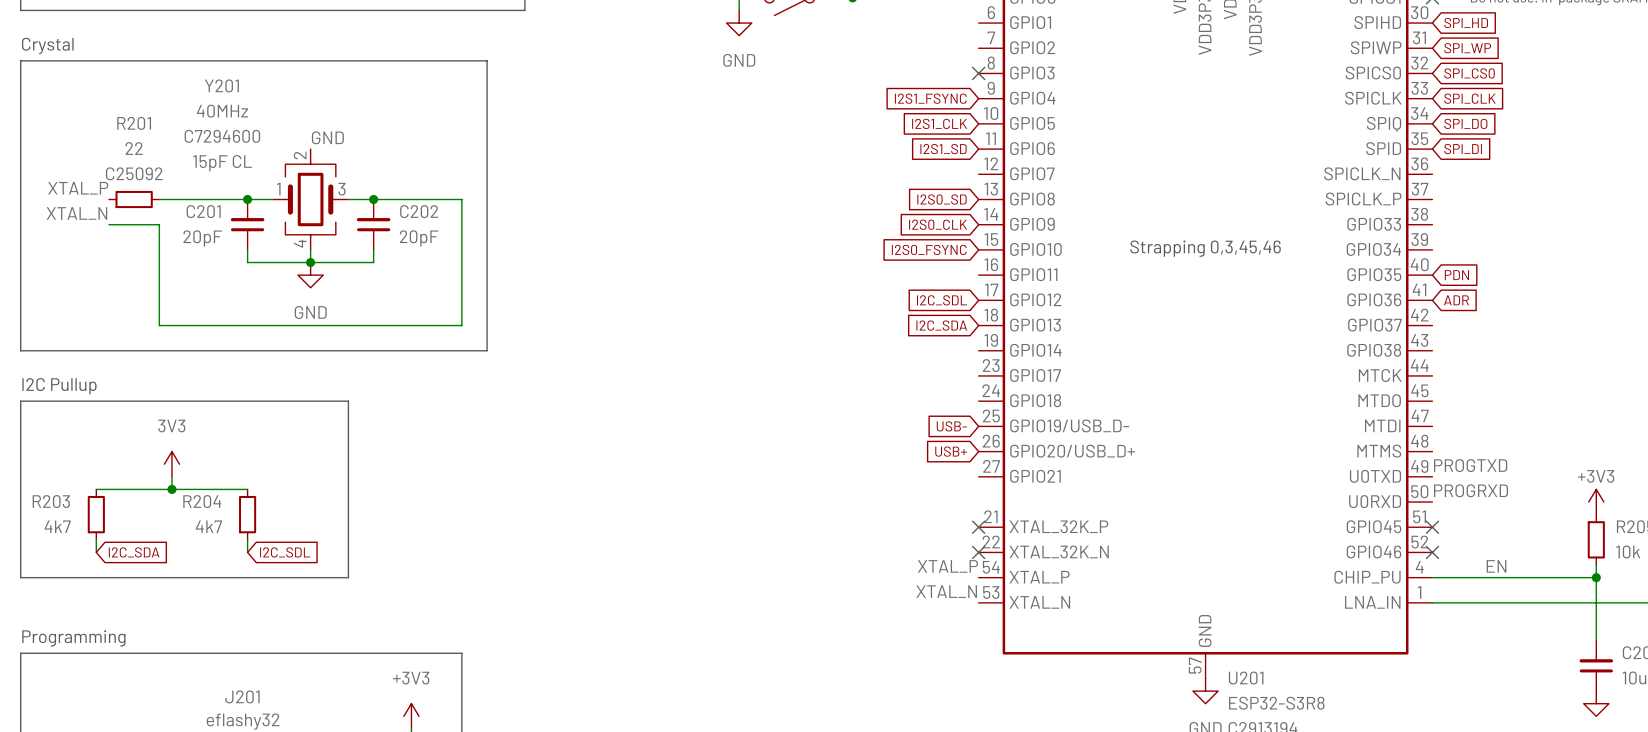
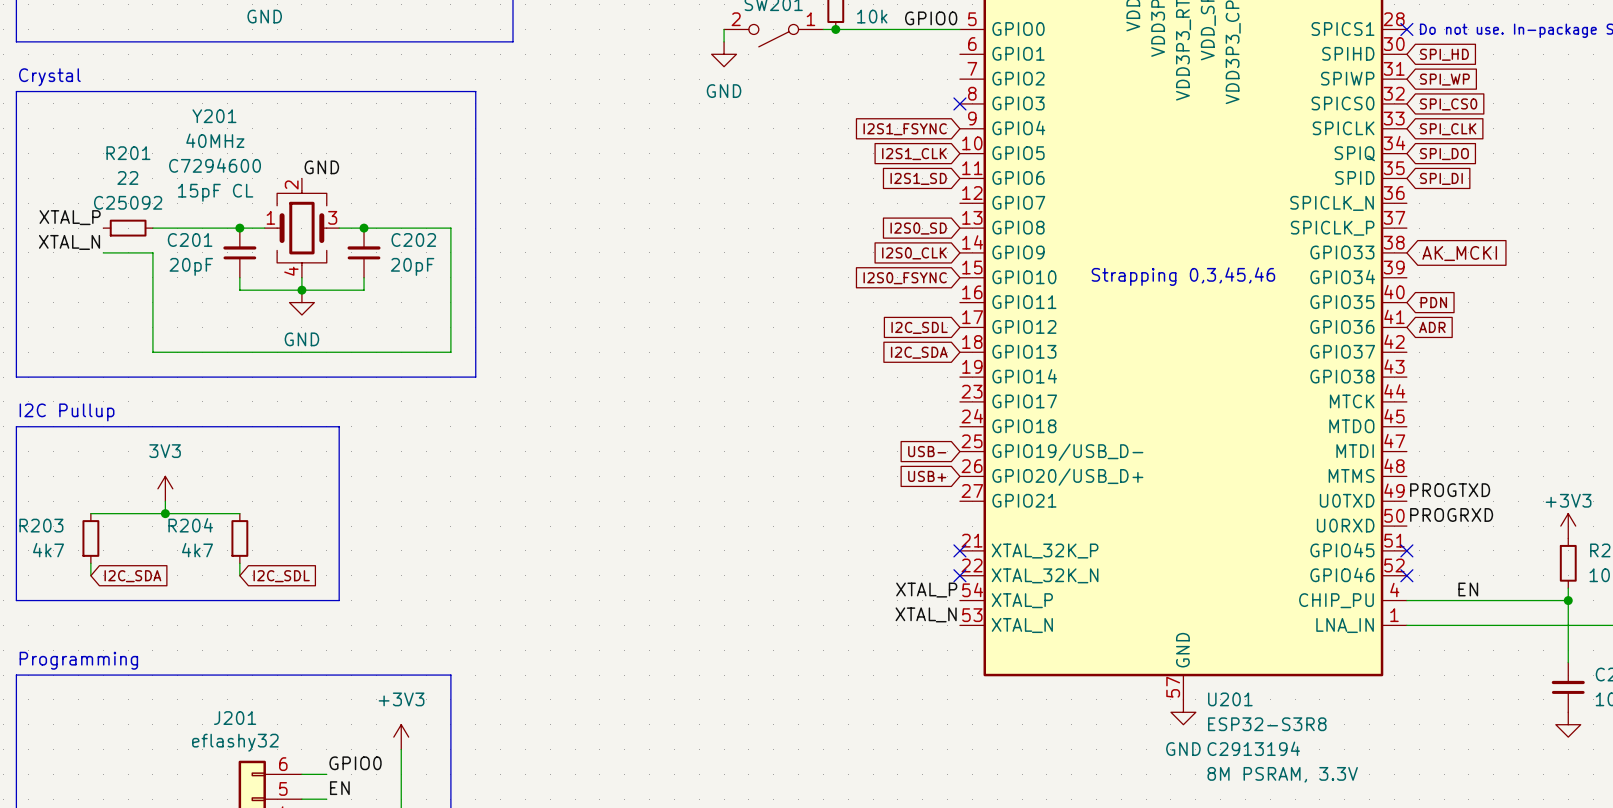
global label: none -> AK_MCKI (1459, 253)

